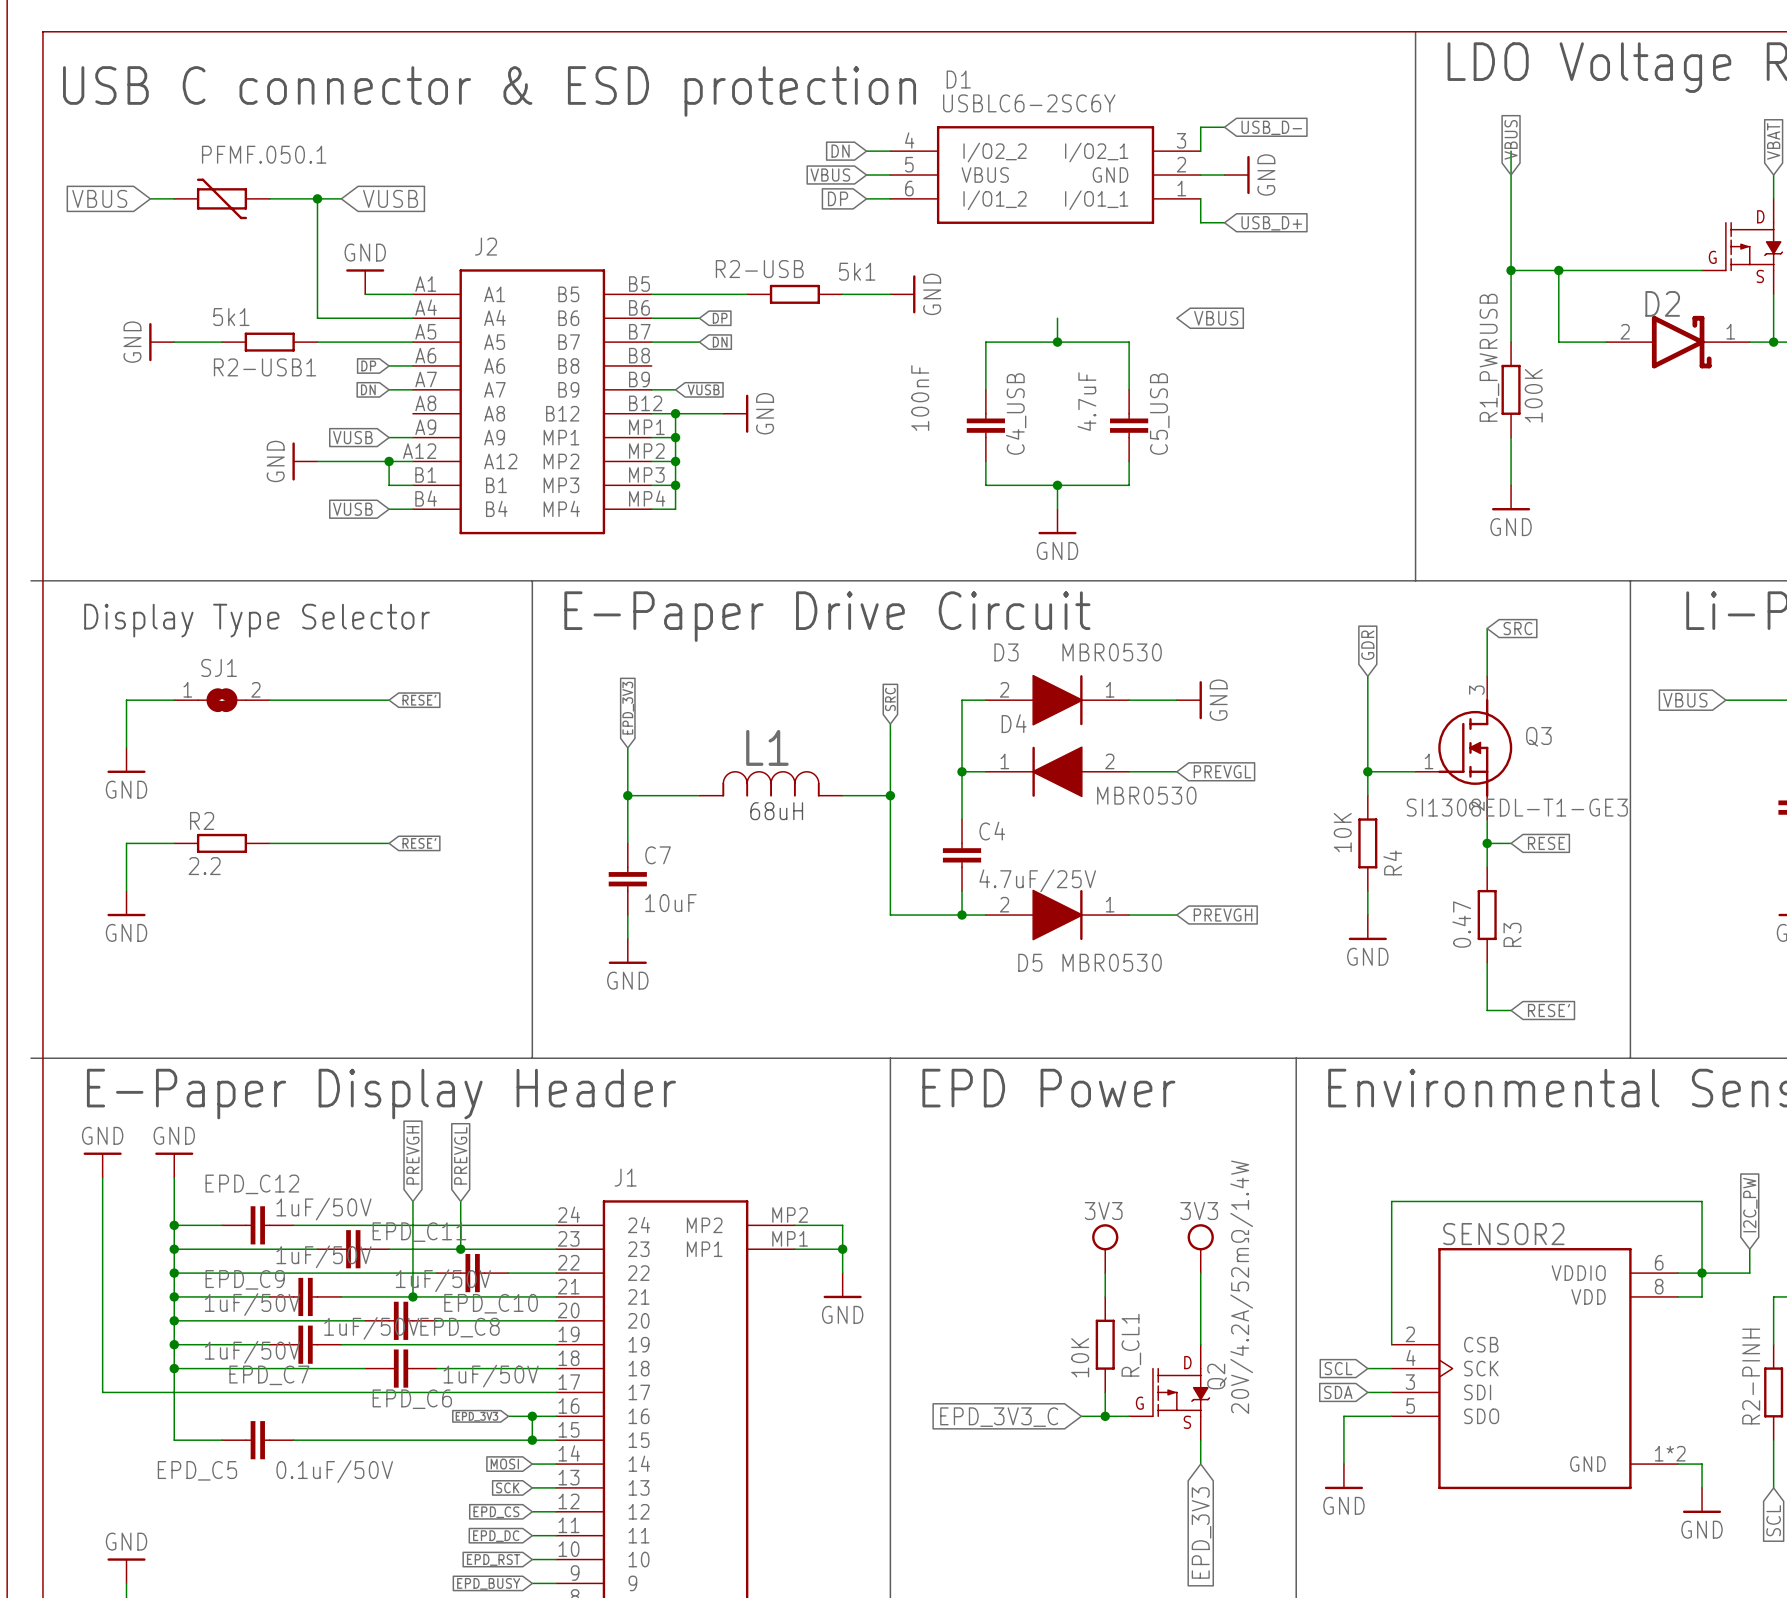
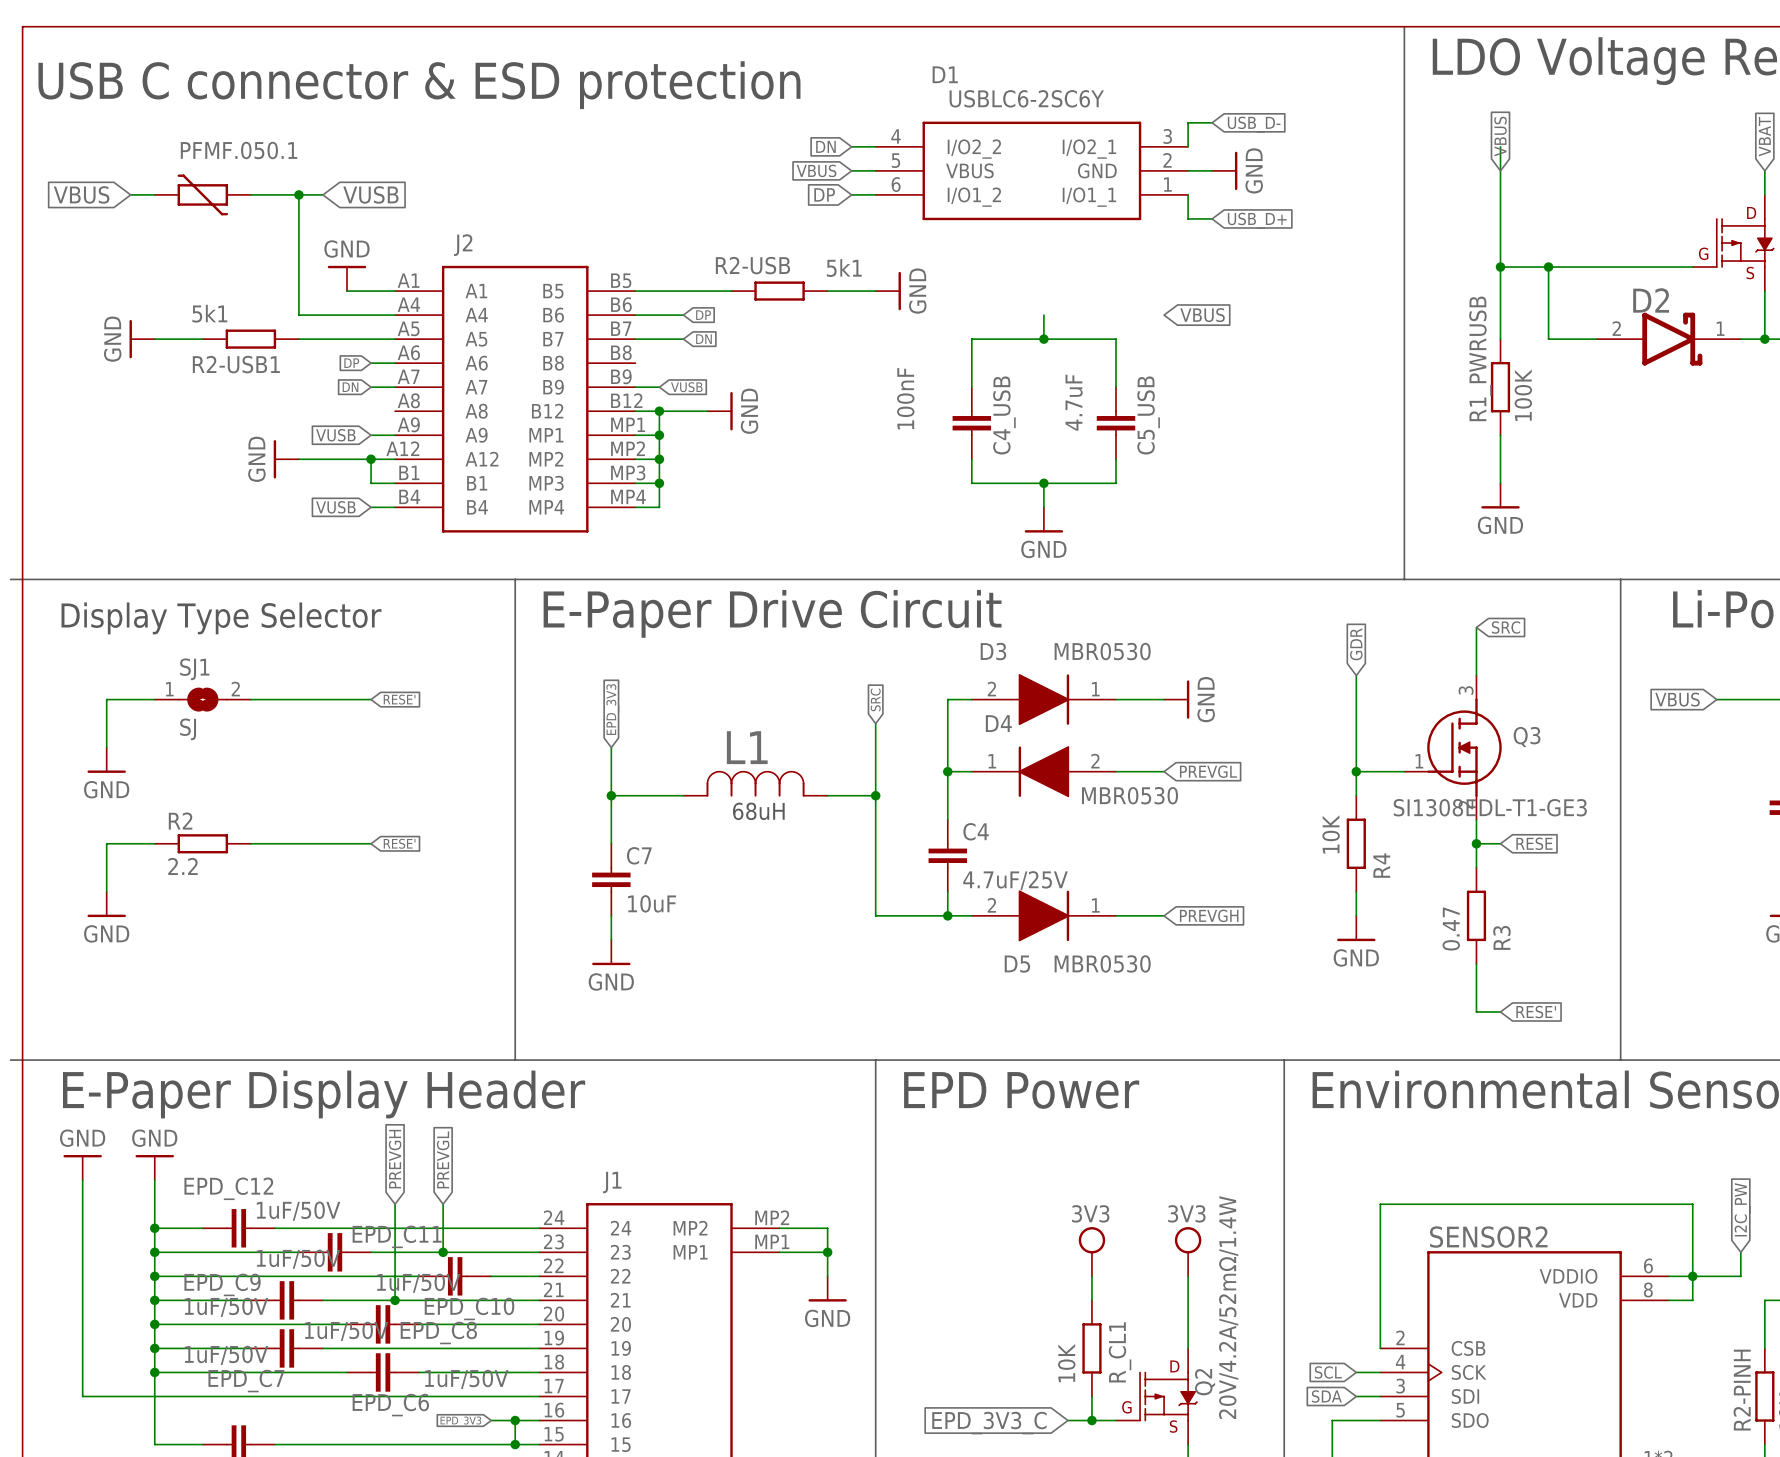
SJ1 value: none -> SJ (188, 729)

